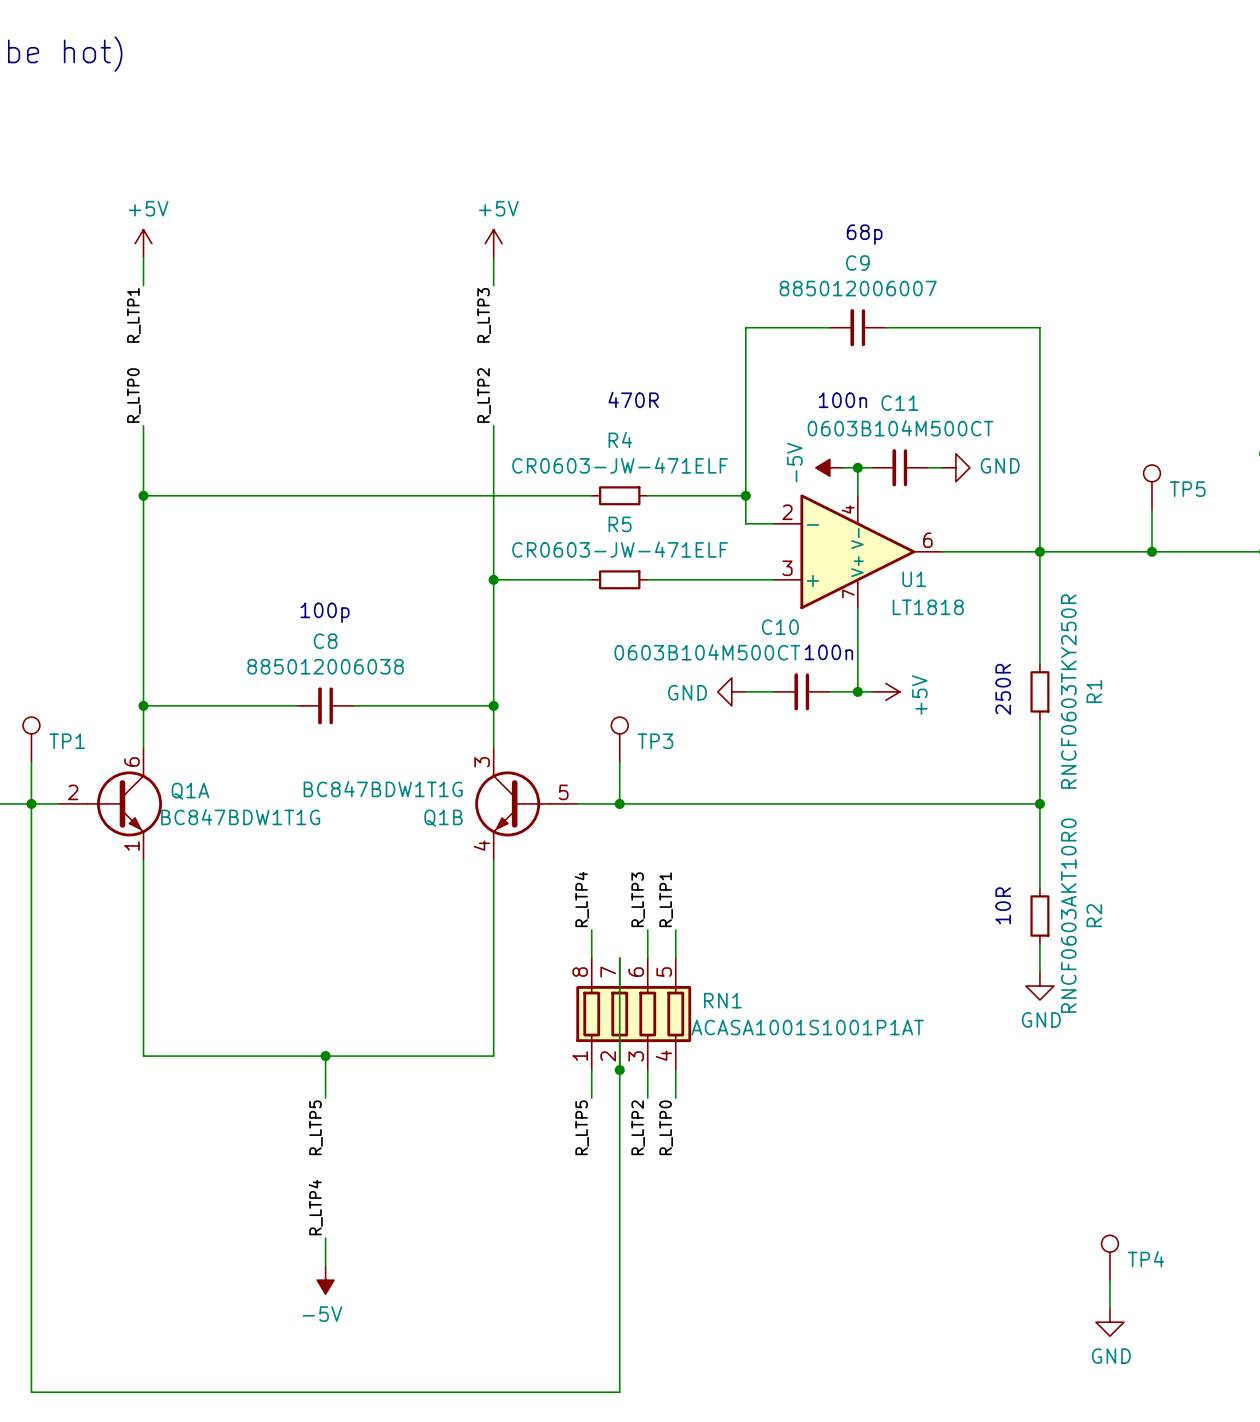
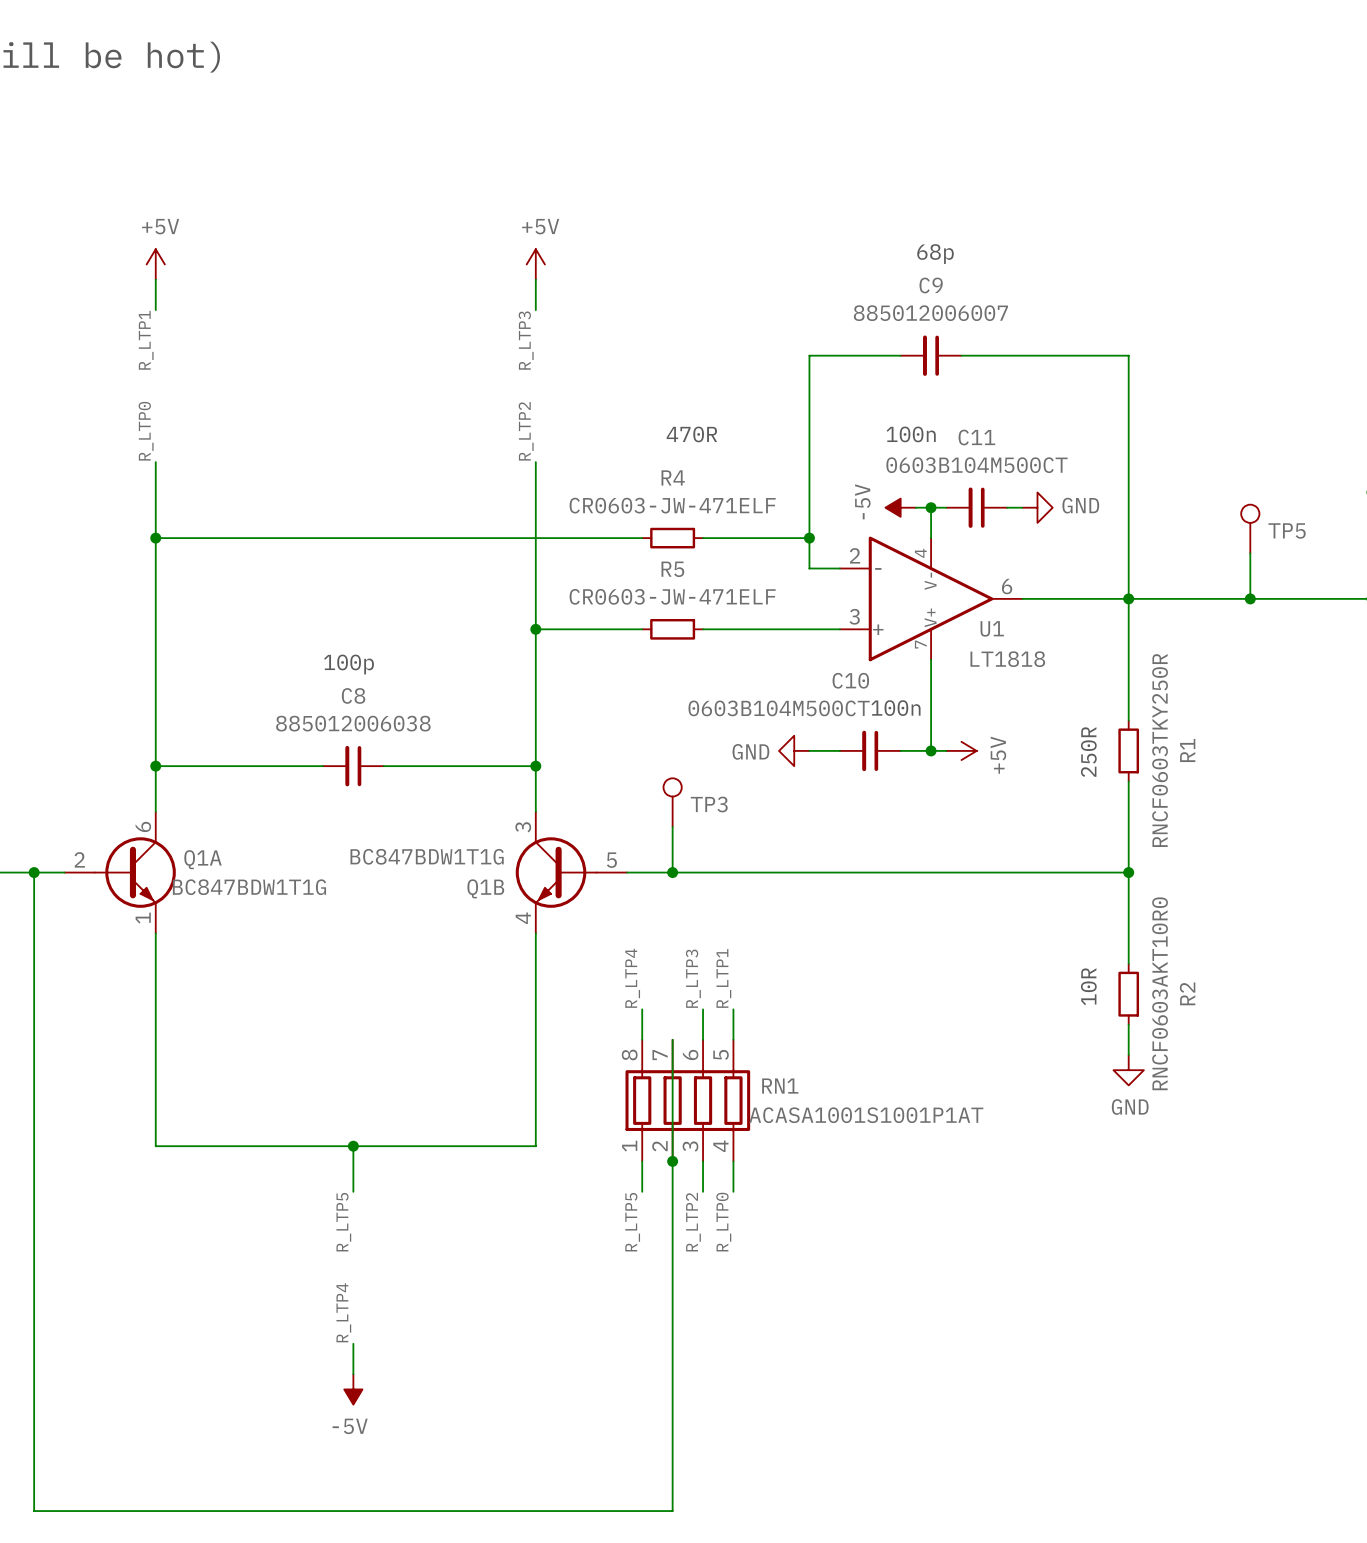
TP1: (31, 739) -> none
wire: (31, 761) (31, 803) -> none
TP4: (1109, 1257) -> none
wire: (1109, 1280) (1109, 1308) -> none
power symbol: GND (1109, 1322) -> none

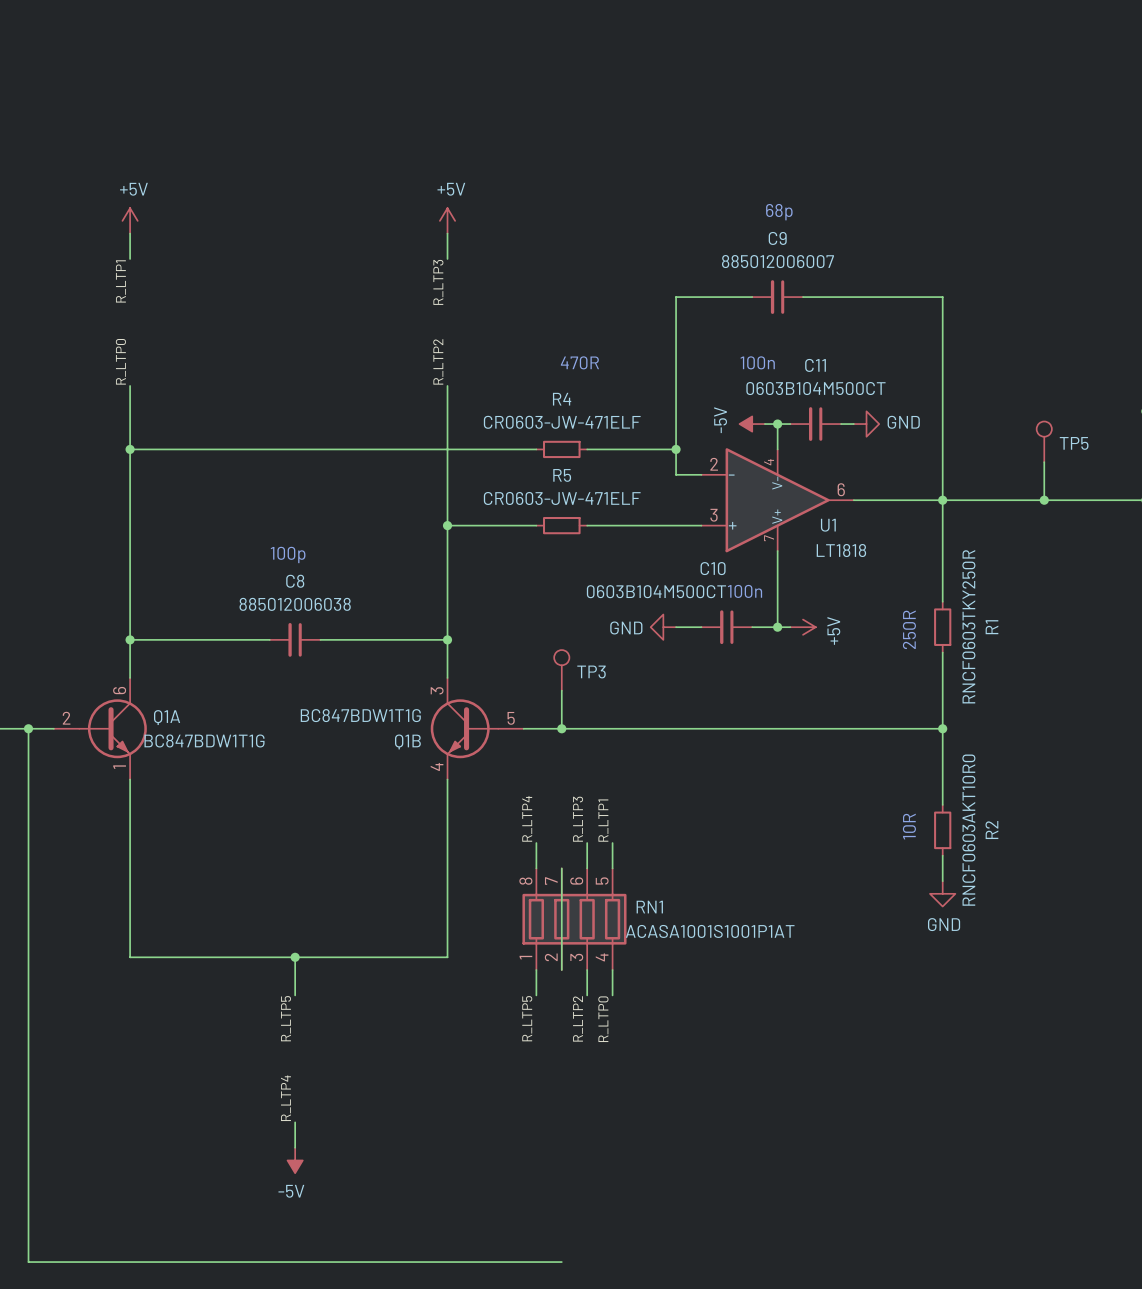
wire: (672, 1161) (672, 1511) -> none
junction: (672, 1161) -> none

